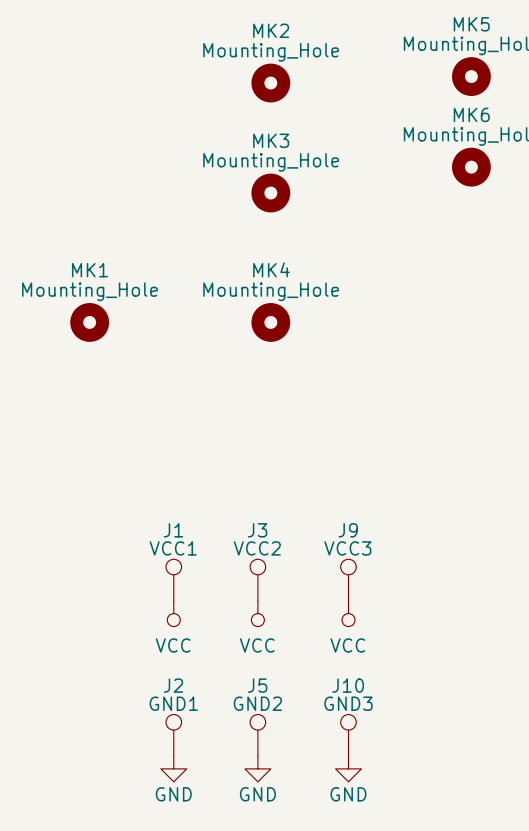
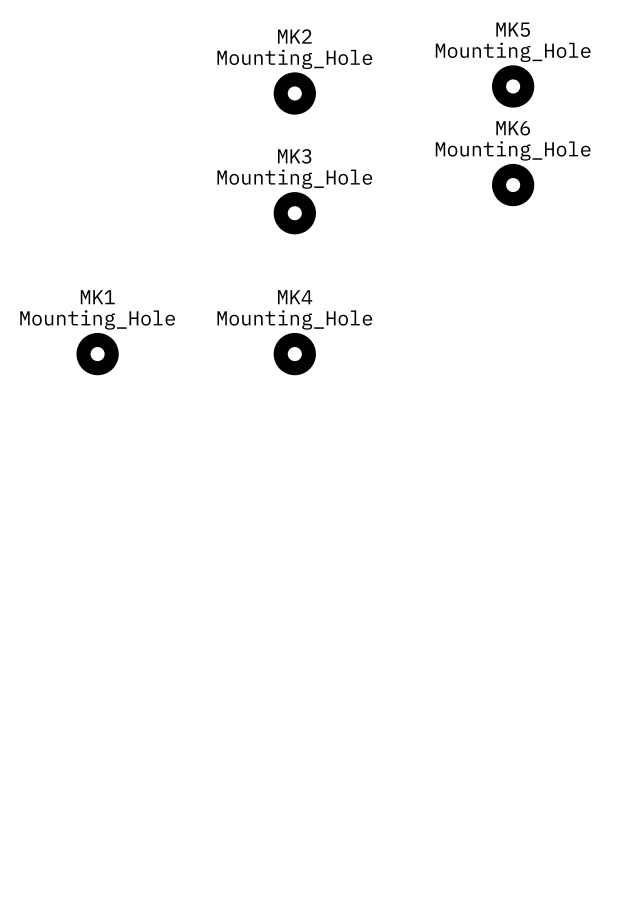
J1: VCC1 (173, 579) -> none
J3: VCC2 (257, 579) -> none
J9: VCC3 (348, 579) -> none
power symbol: VCC (173, 613) -> none
power symbol: VCC (257, 613) -> none
power symbol: VCC (348, 613) -> none
J2: GND1 (173, 735) -> none
J5: GND2 (257, 735) -> none
J10: GND3 (348, 735) -> none
power symbol: GND (173, 768) -> none
power symbol: GND (257, 768) -> none
power symbol: GND (348, 768) -> none

